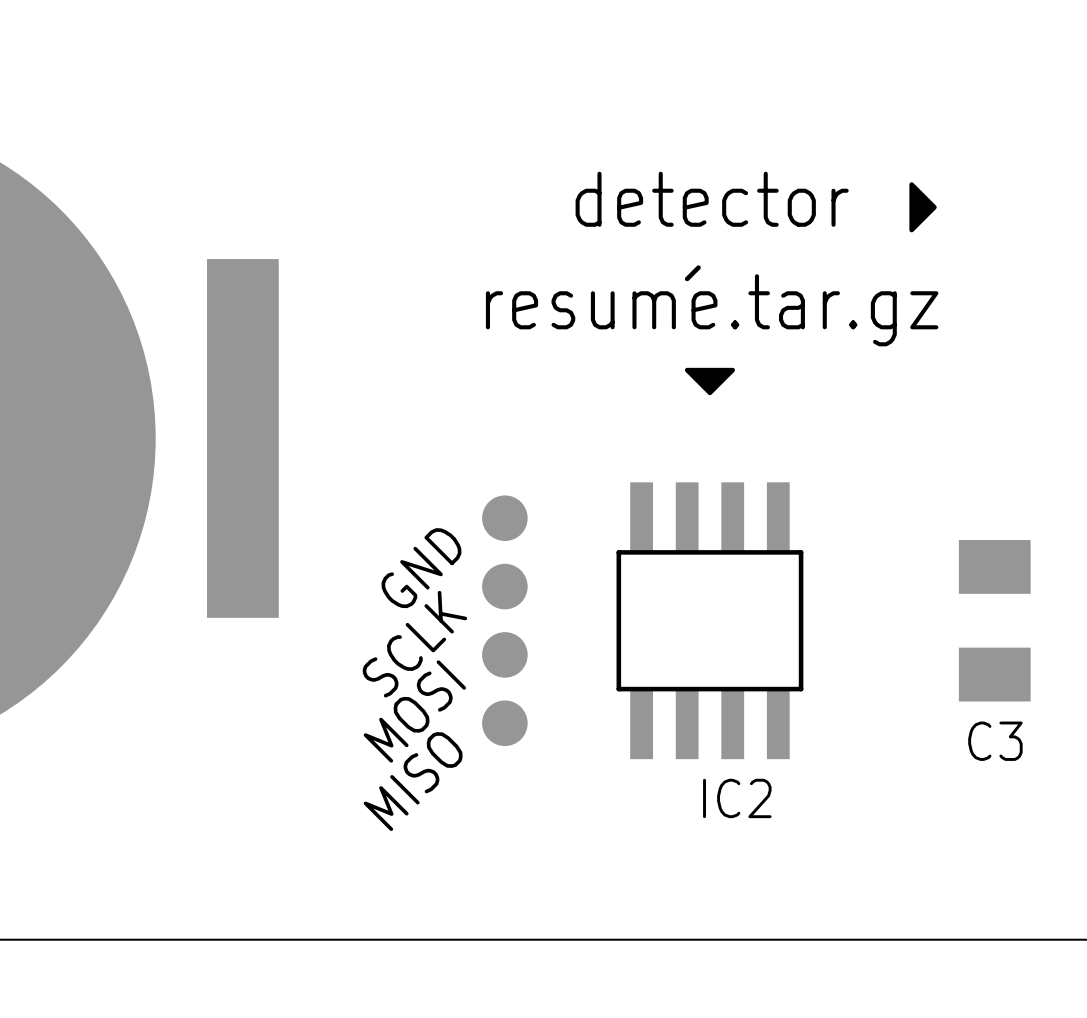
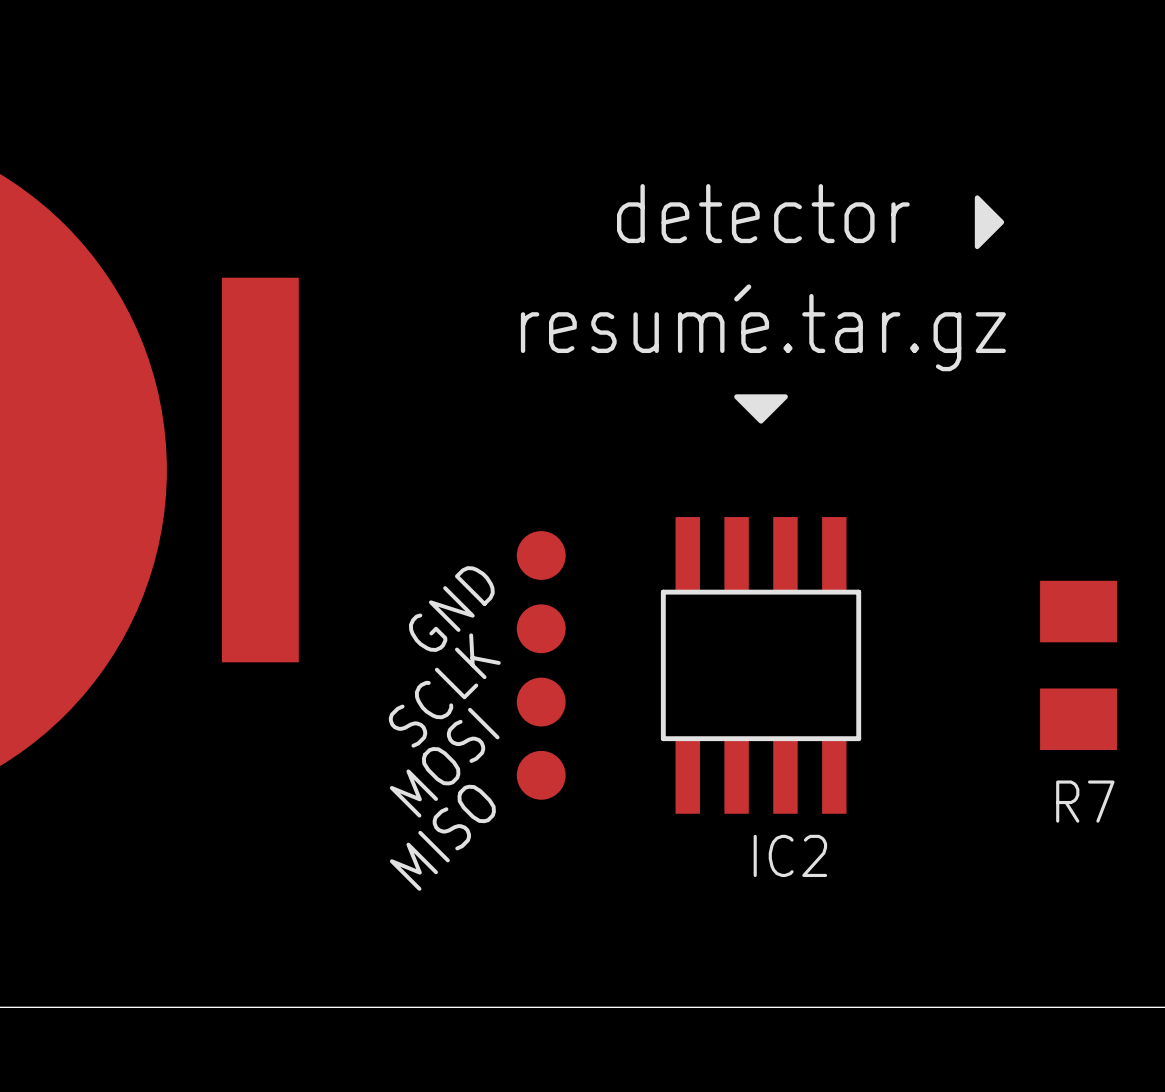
C3: (994, 620) -> none
R7: none -> (1078, 665)

